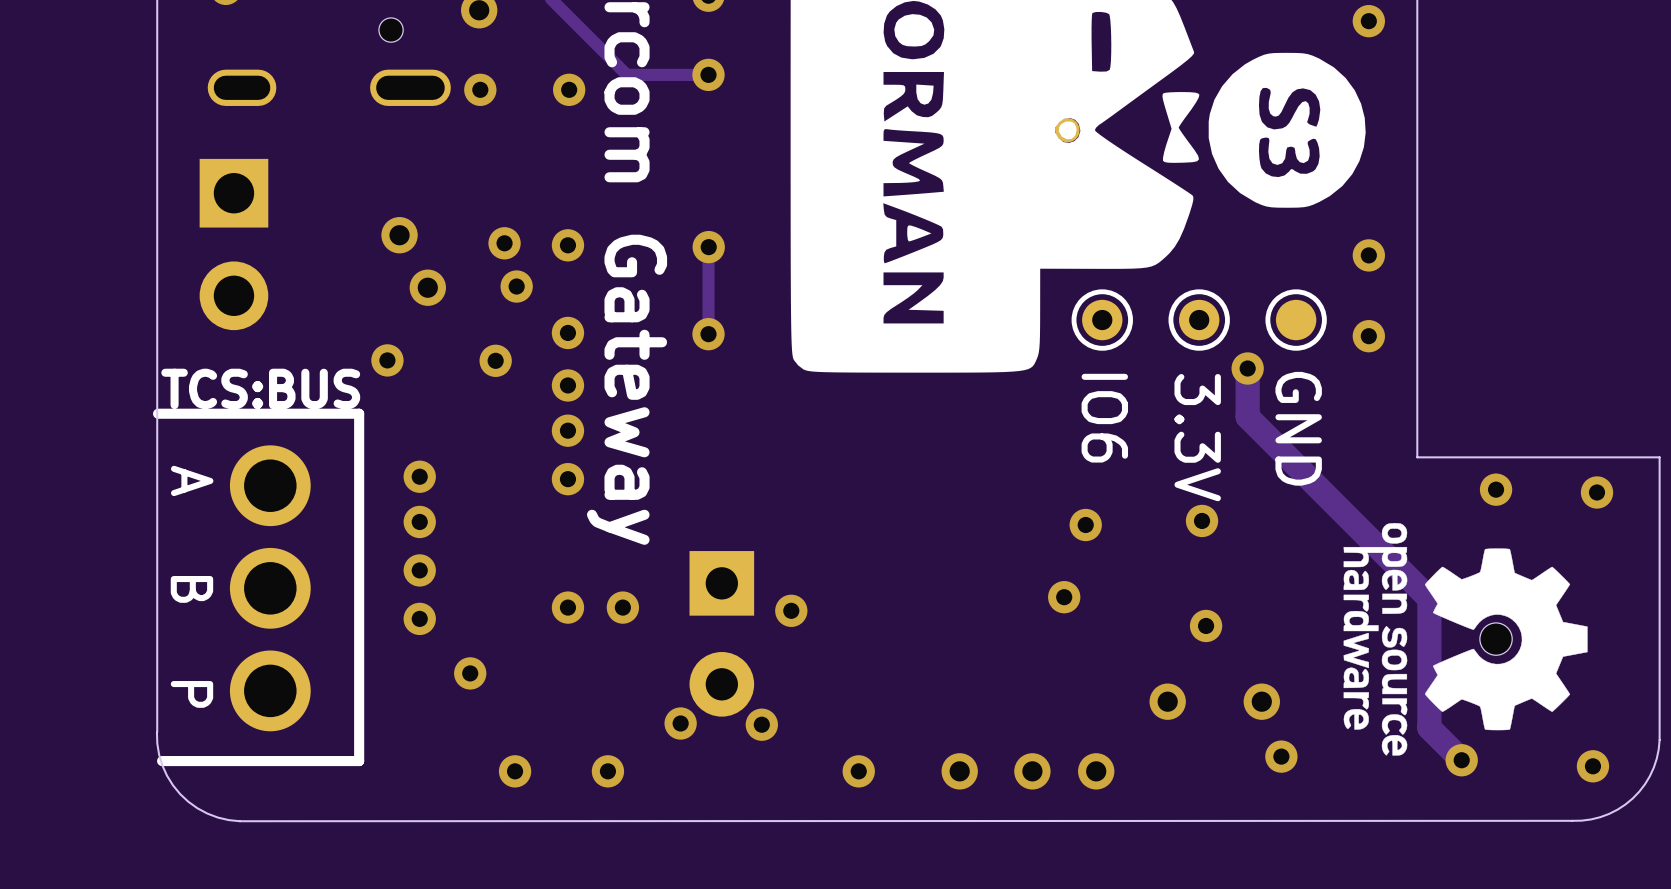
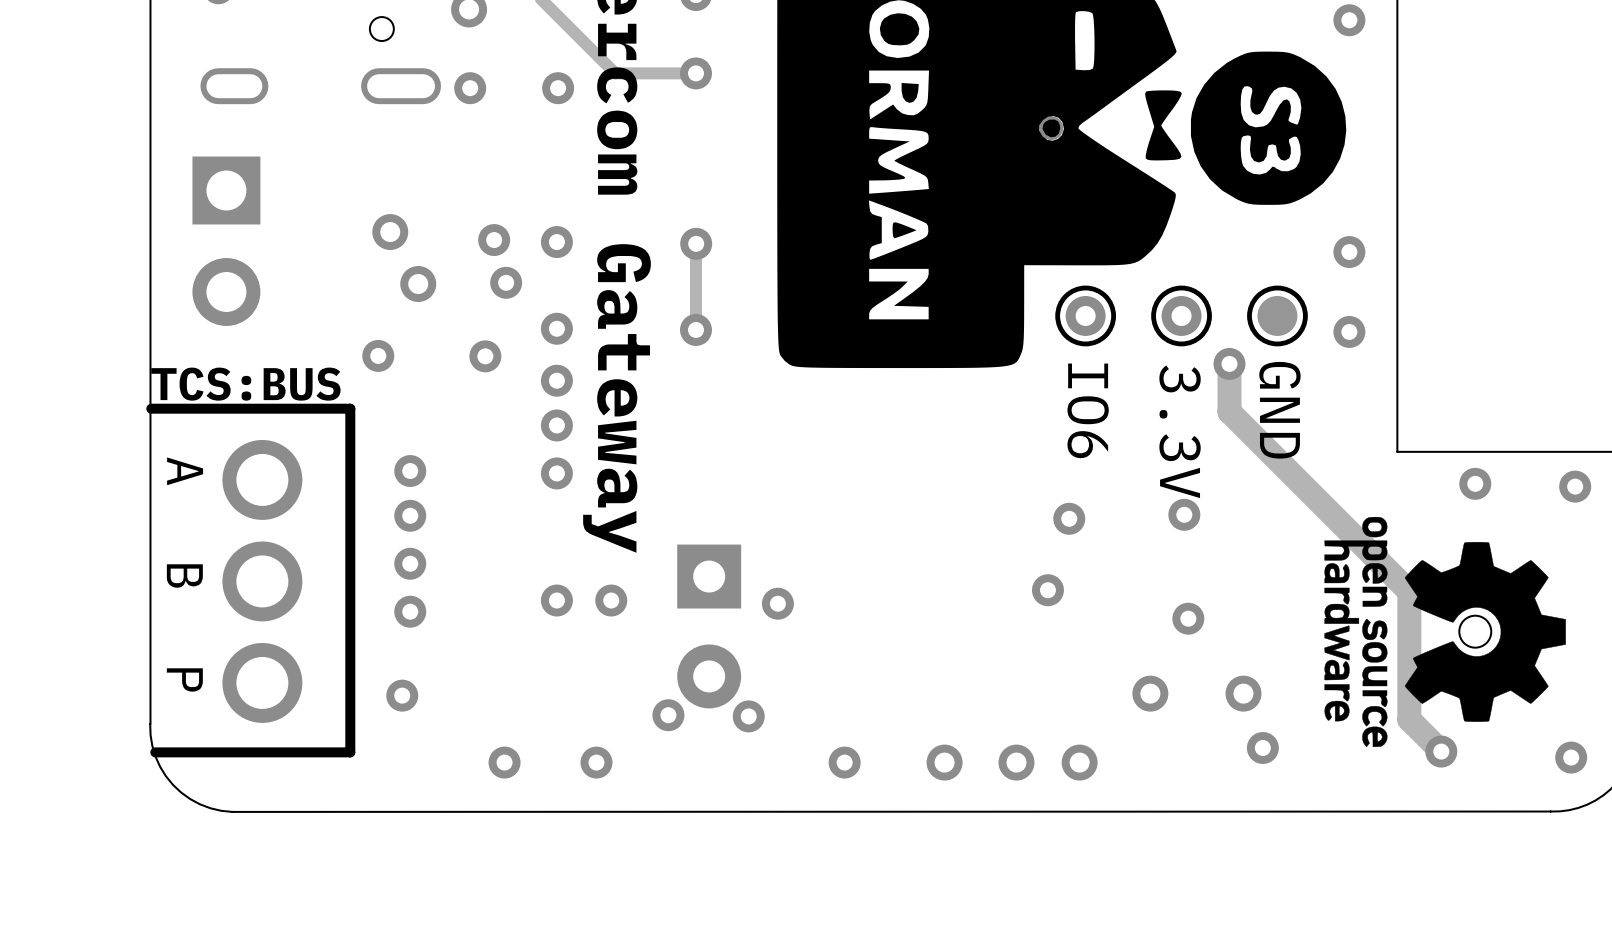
via position: (470, 673) -> (402, 695)

